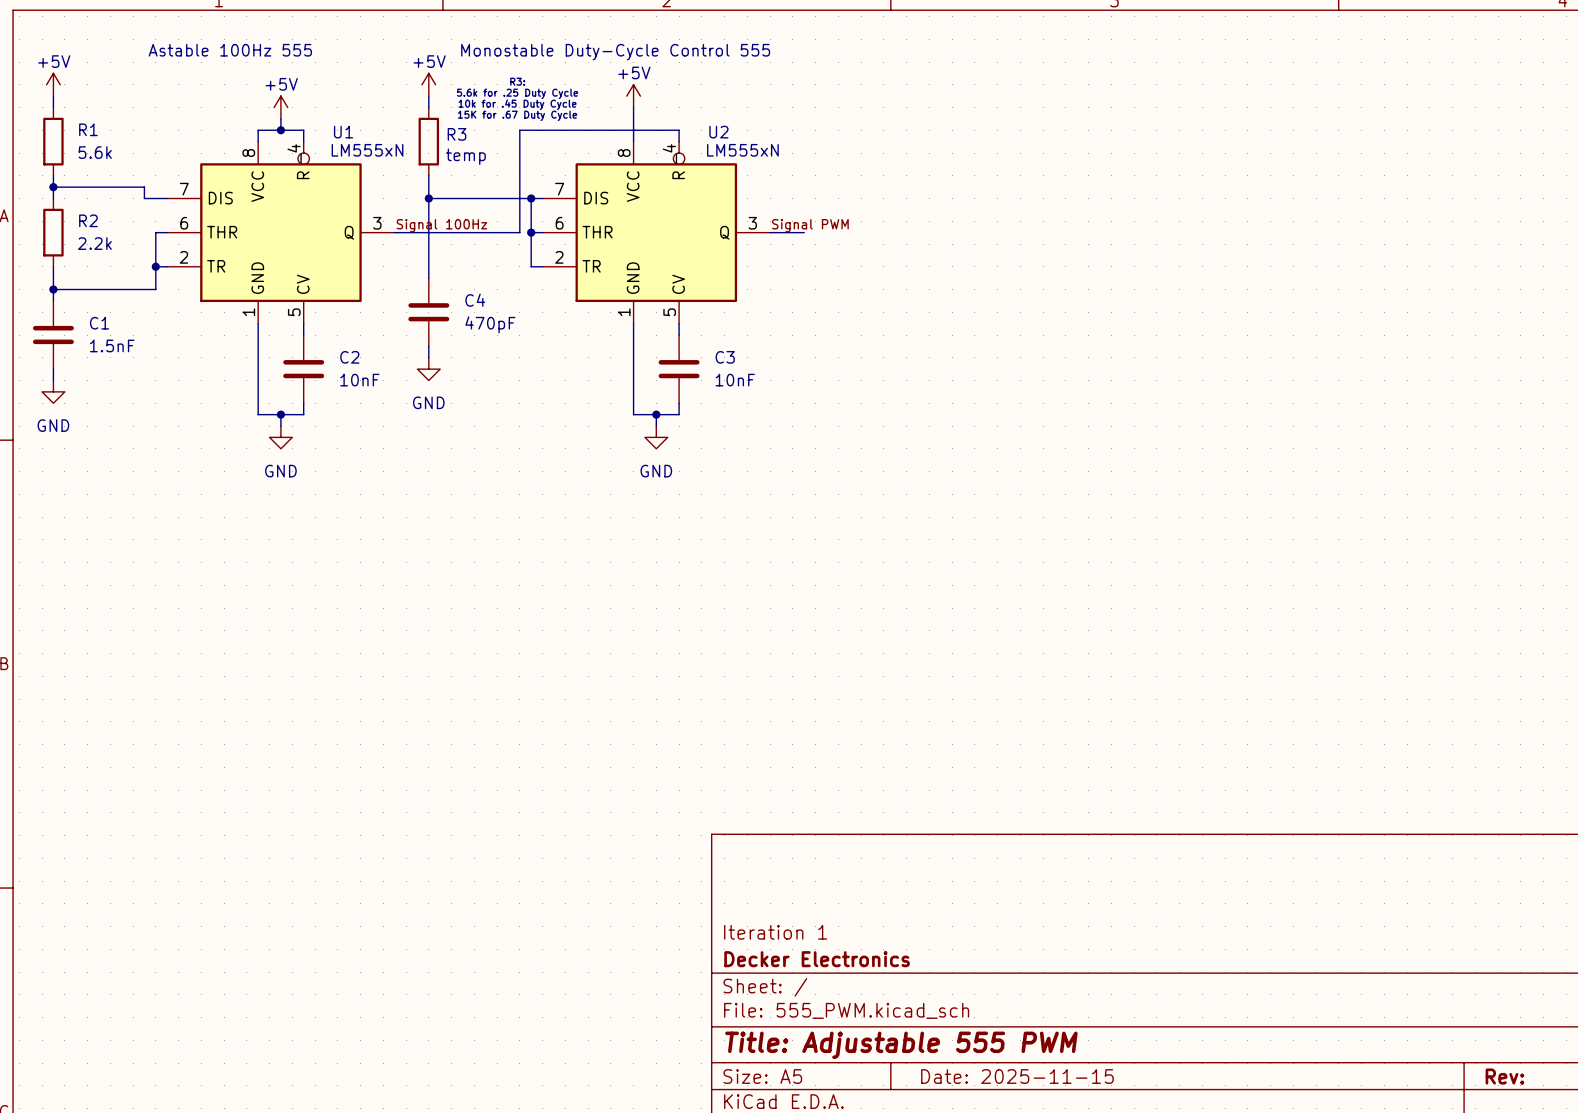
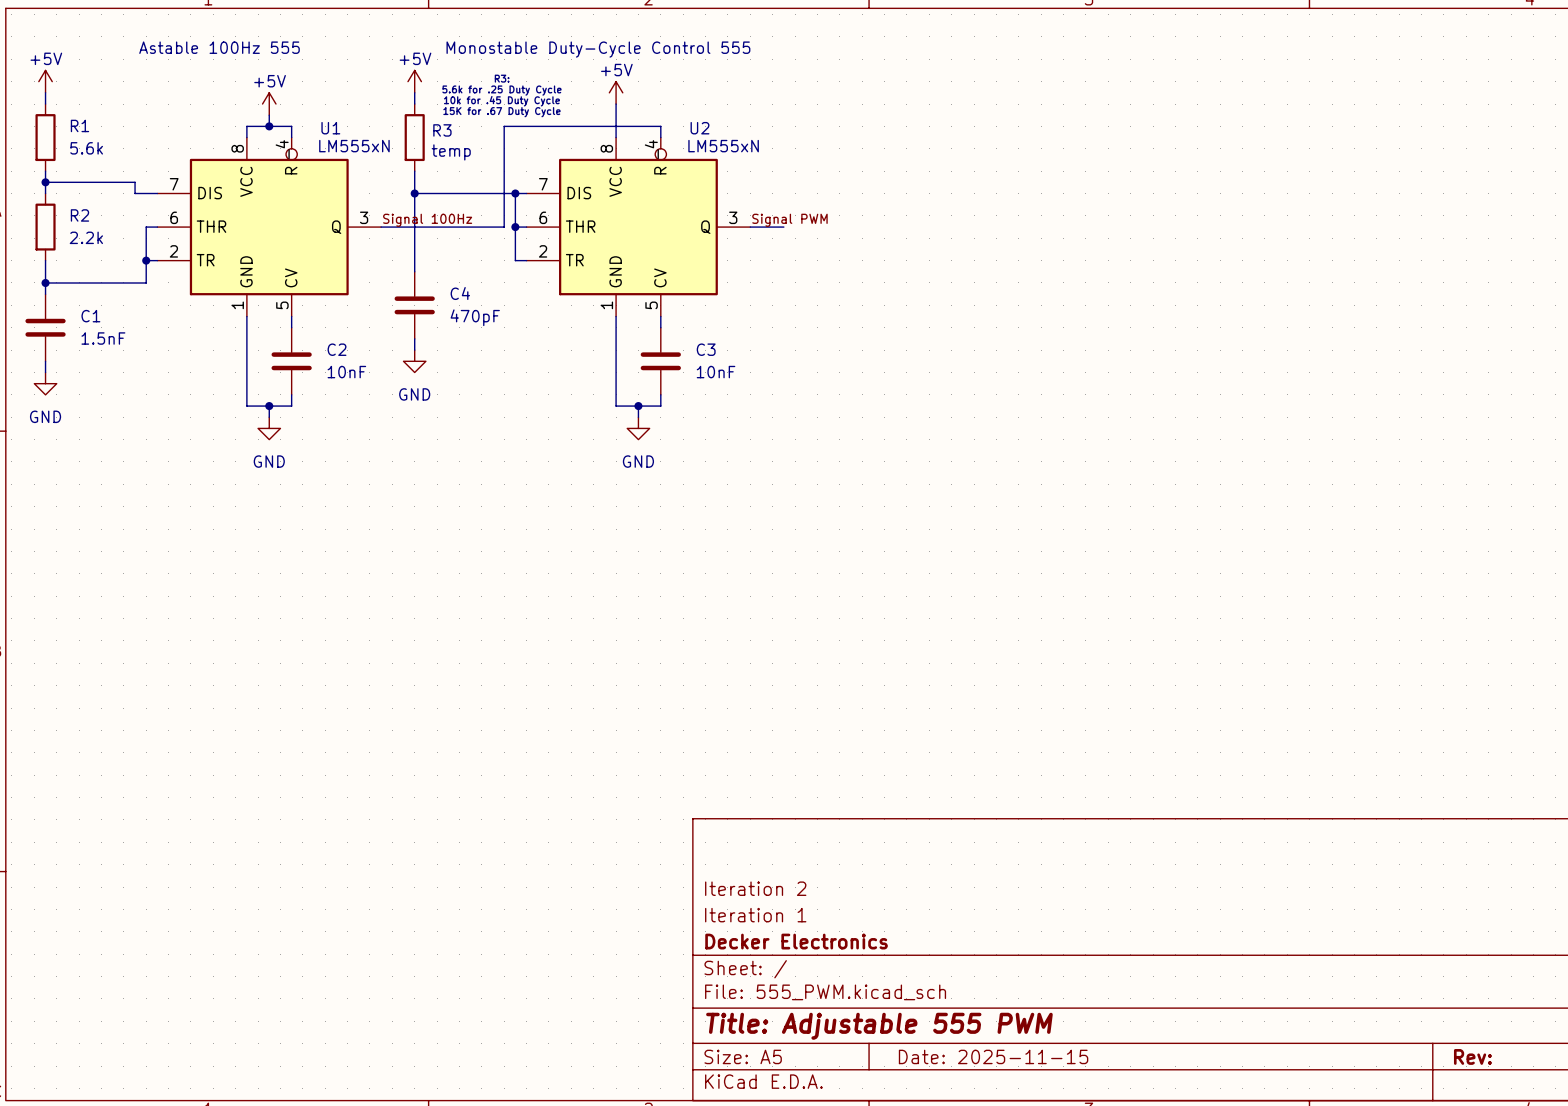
title block: none -> Iteration 2 (755, 888)

